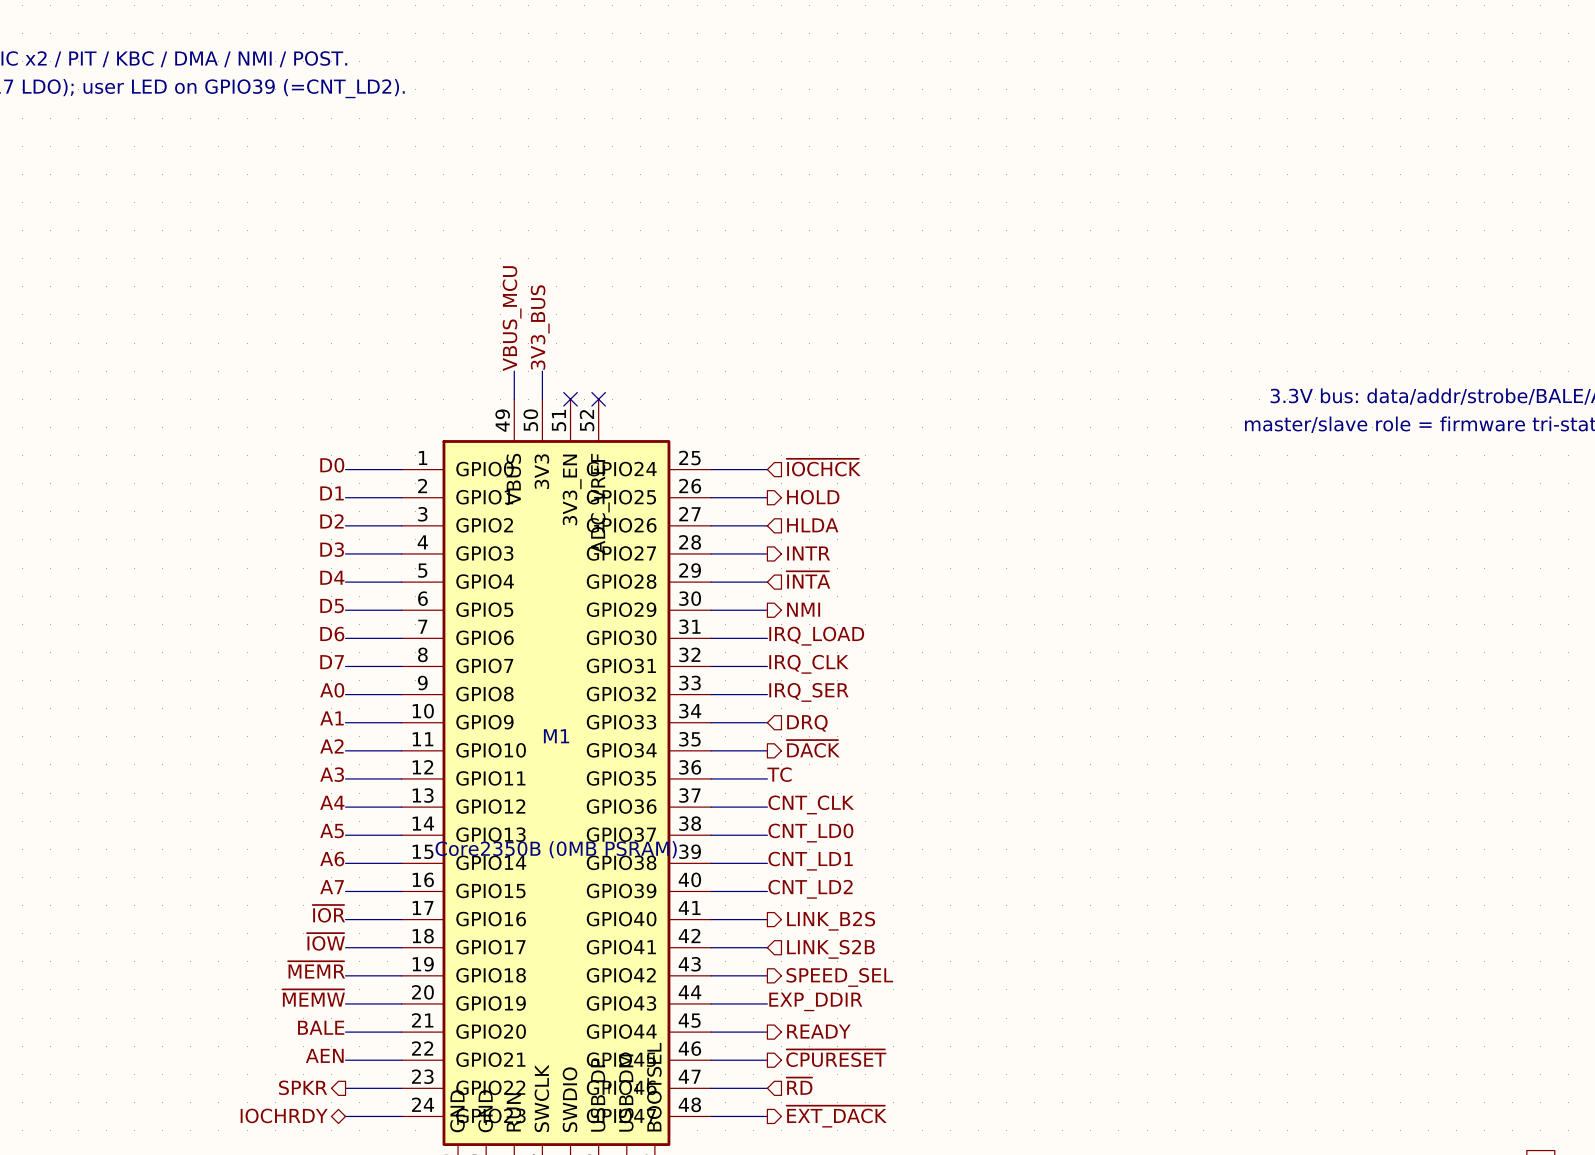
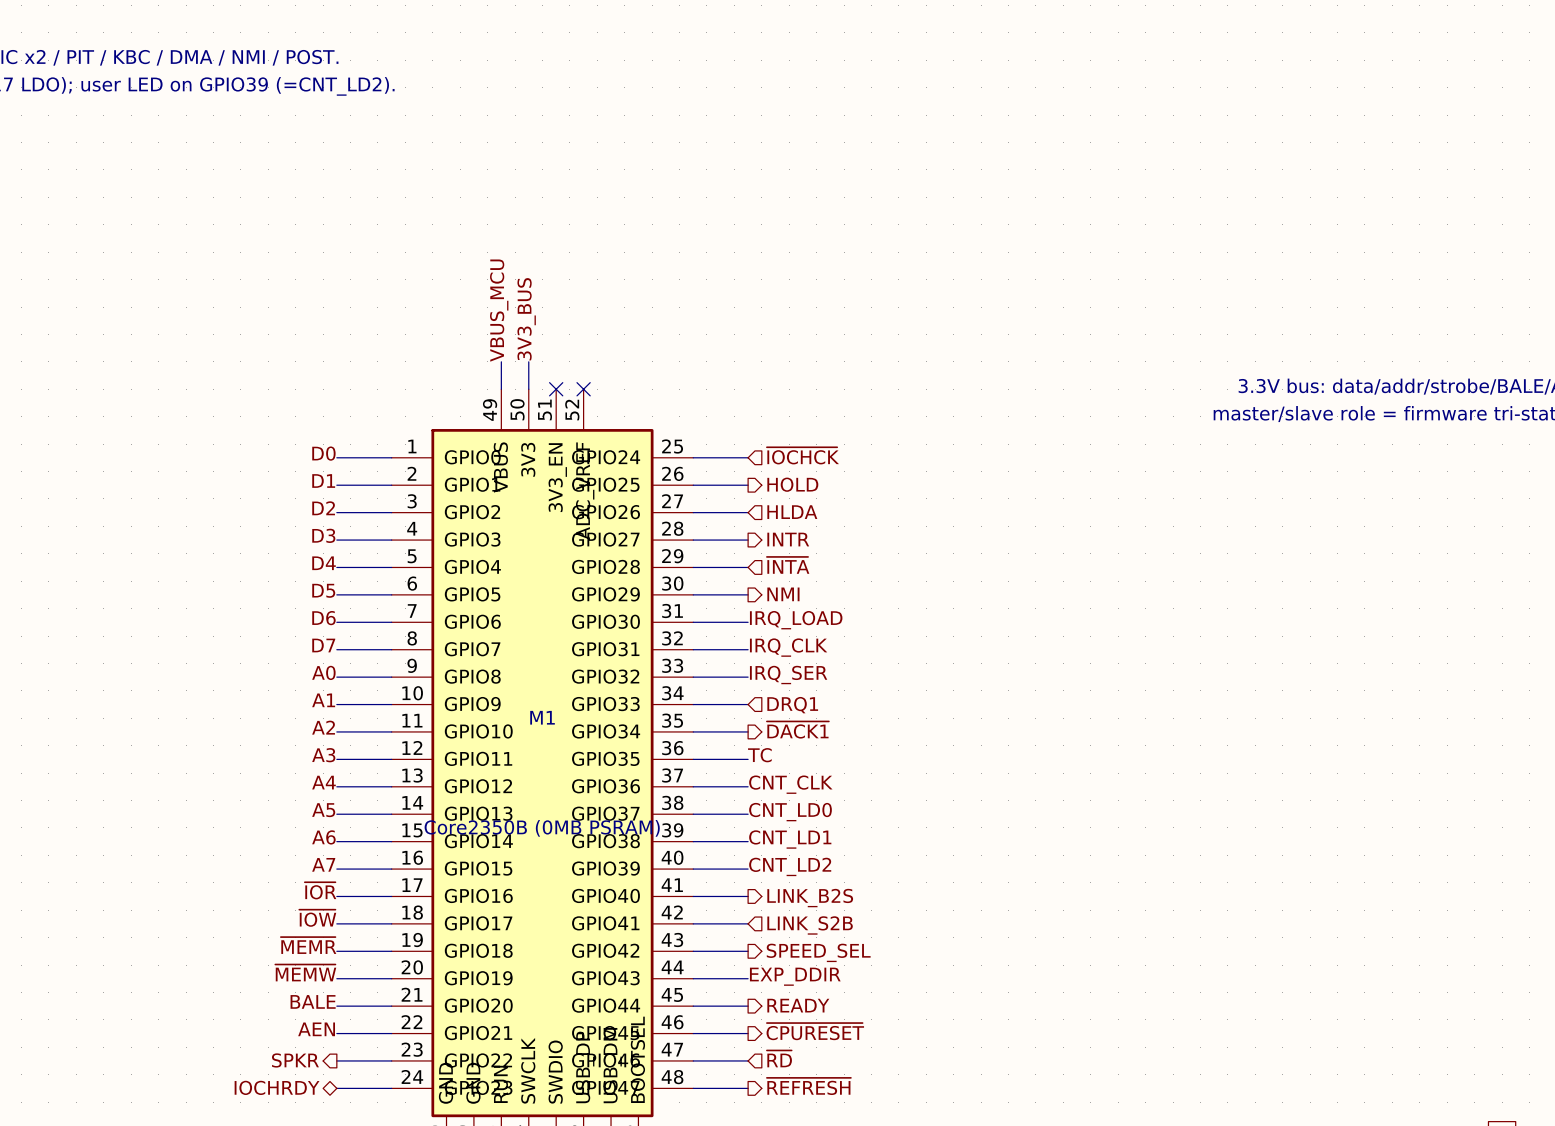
hierarchical label: DRQ (807, 723) -> DRQ1 (792, 705)
hierarchical label: ~{DACK} (813, 748) -> ~{DACK1} (797, 730)
hierarchical label: ~{EXT_DACK} (836, 1116) -> ~{REFRESH} (808, 1086)

